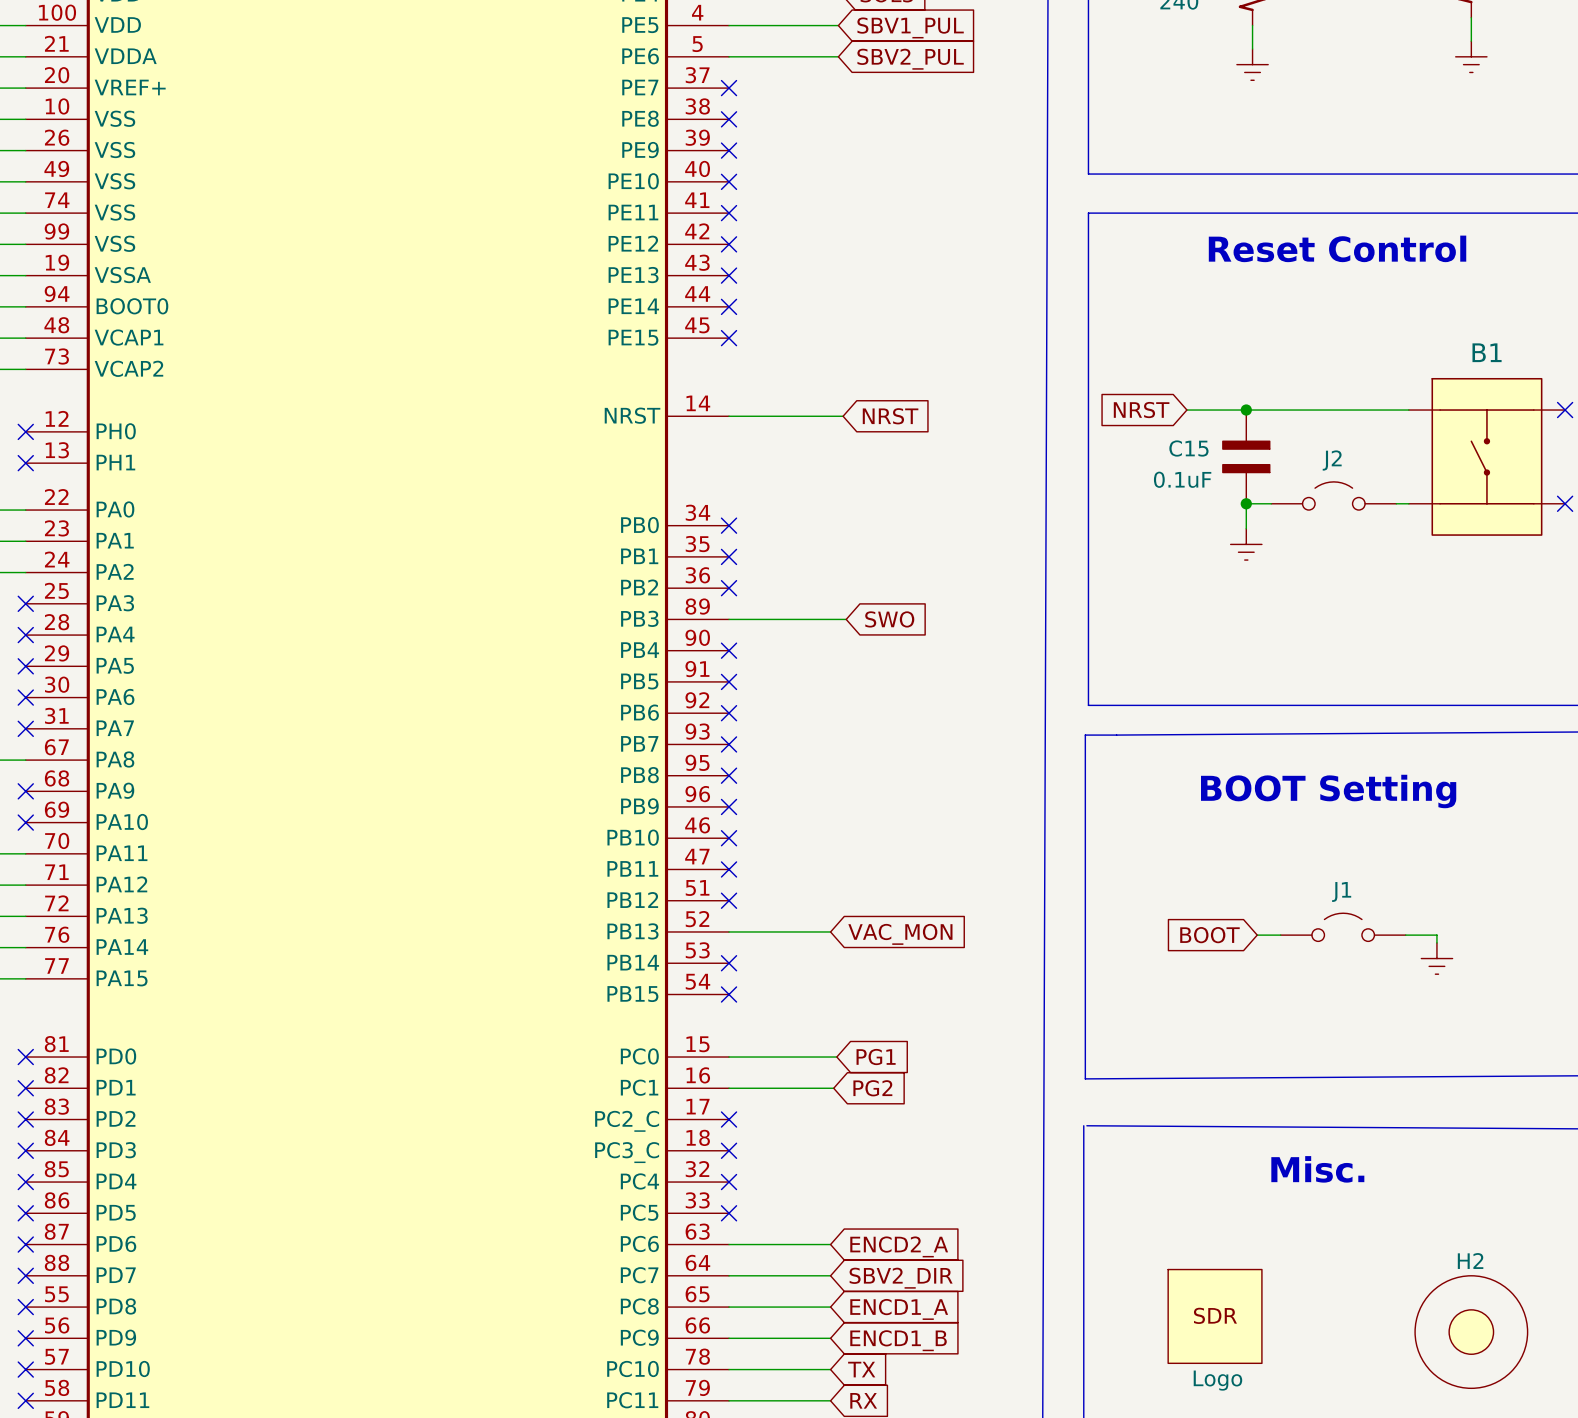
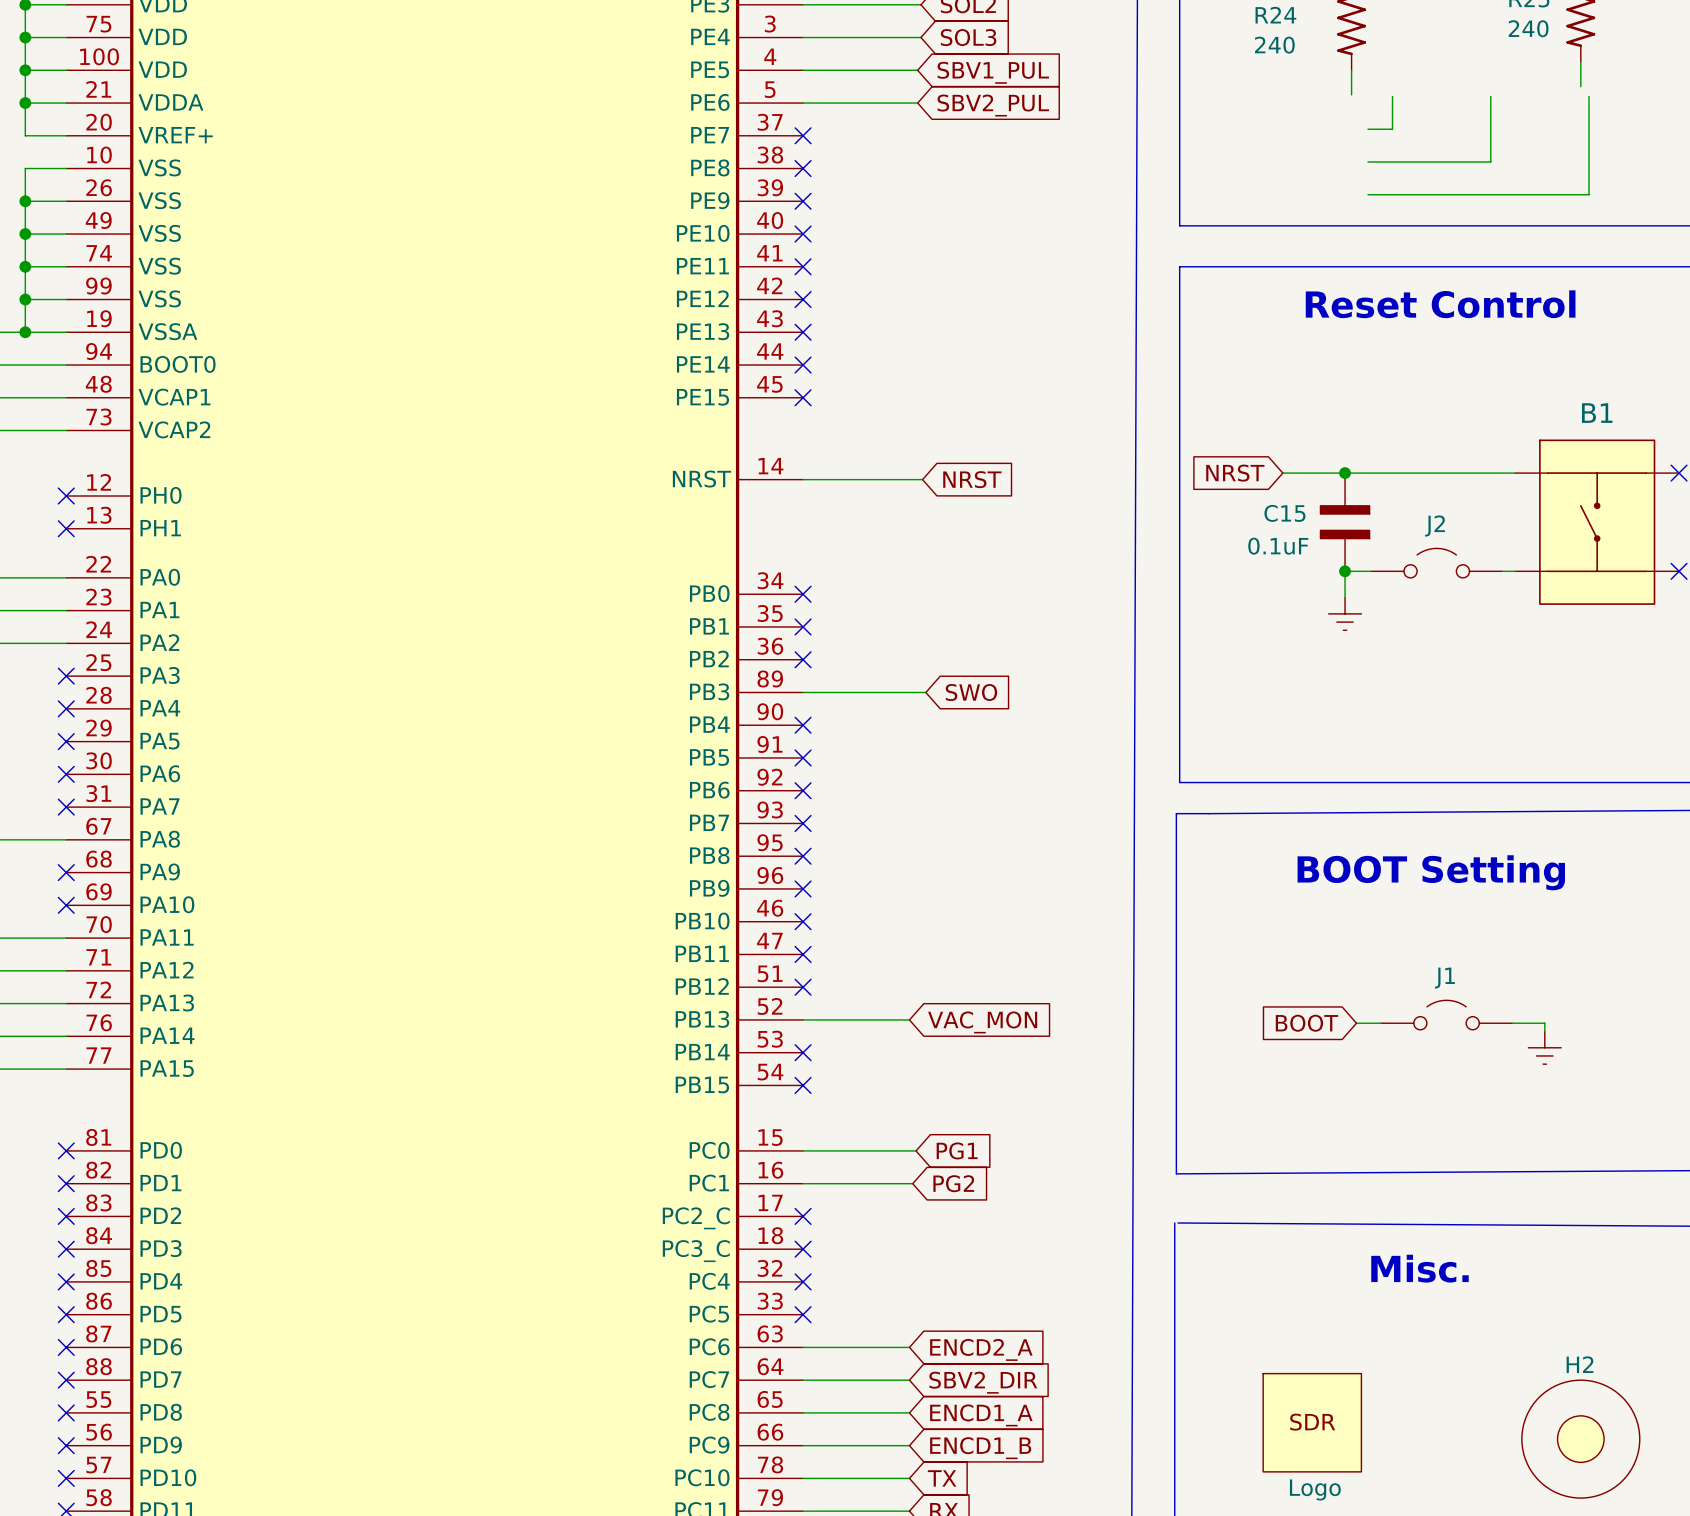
wire: none -> (1392, 96) (1392, 129) (1367, 129)
wire: none -> (1490, 96) (1490, 161) (1367, 161)
wire: none -> (1589, 96) (1589, 194) (1367, 194)
power symbol: (1471, 56) -> none
power symbol: (1252, 64) -> none

